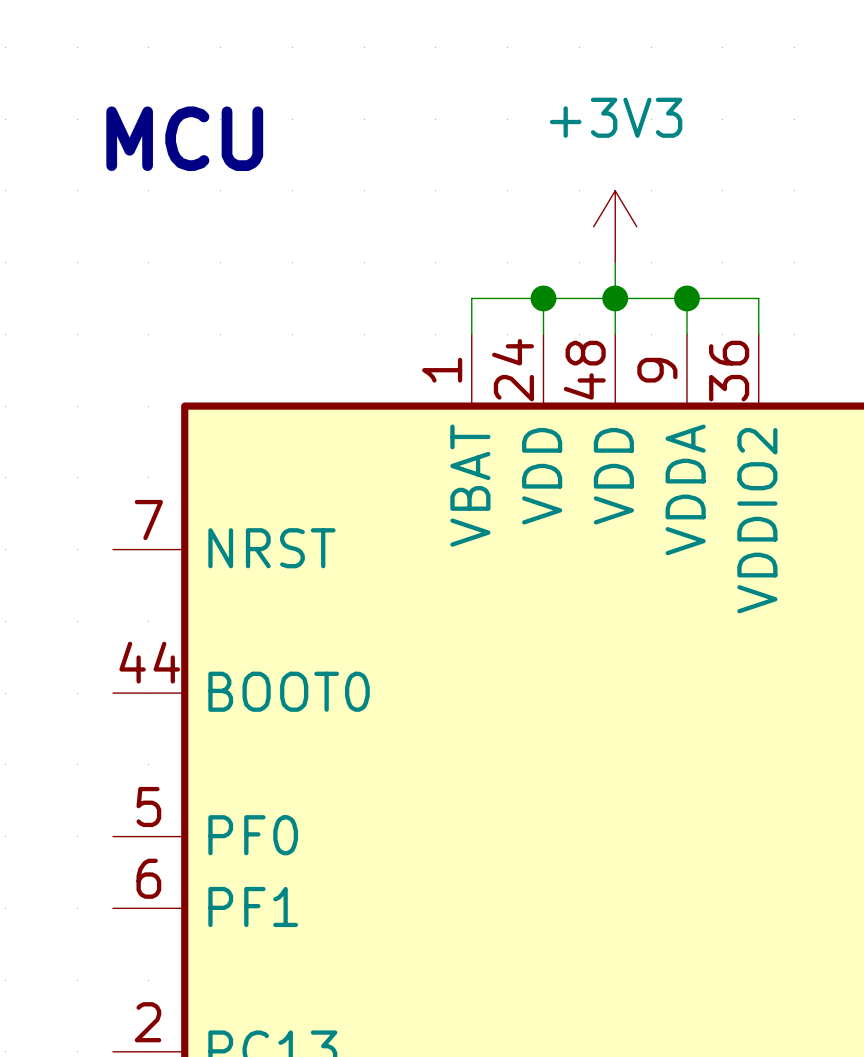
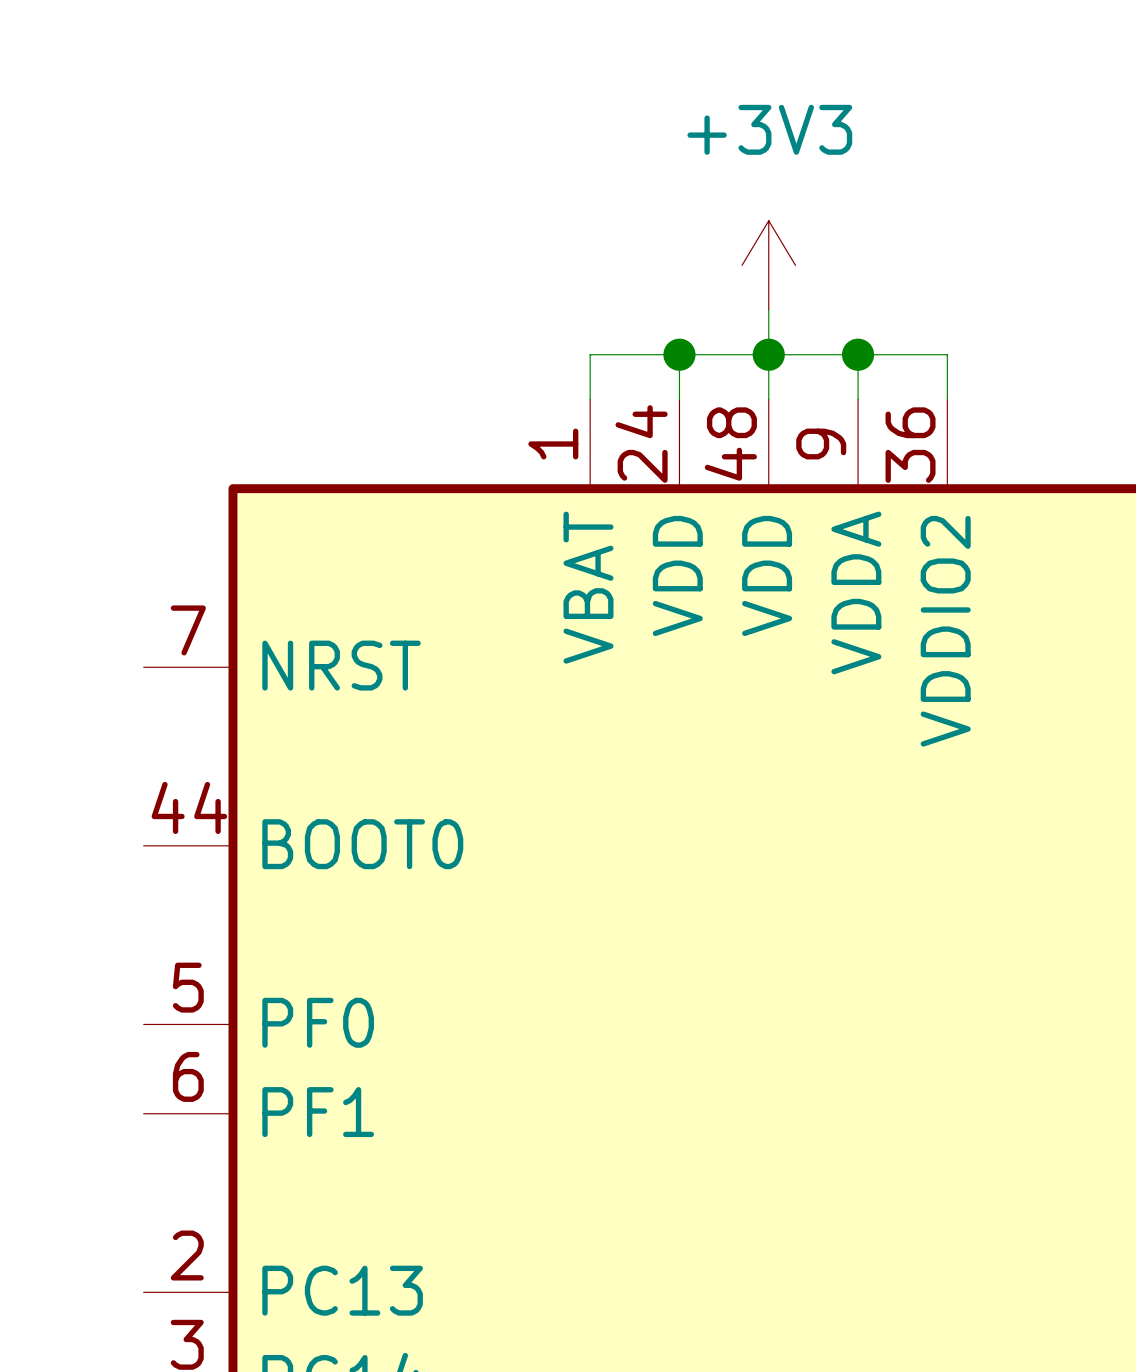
text: MCU (184, 138) -> none

